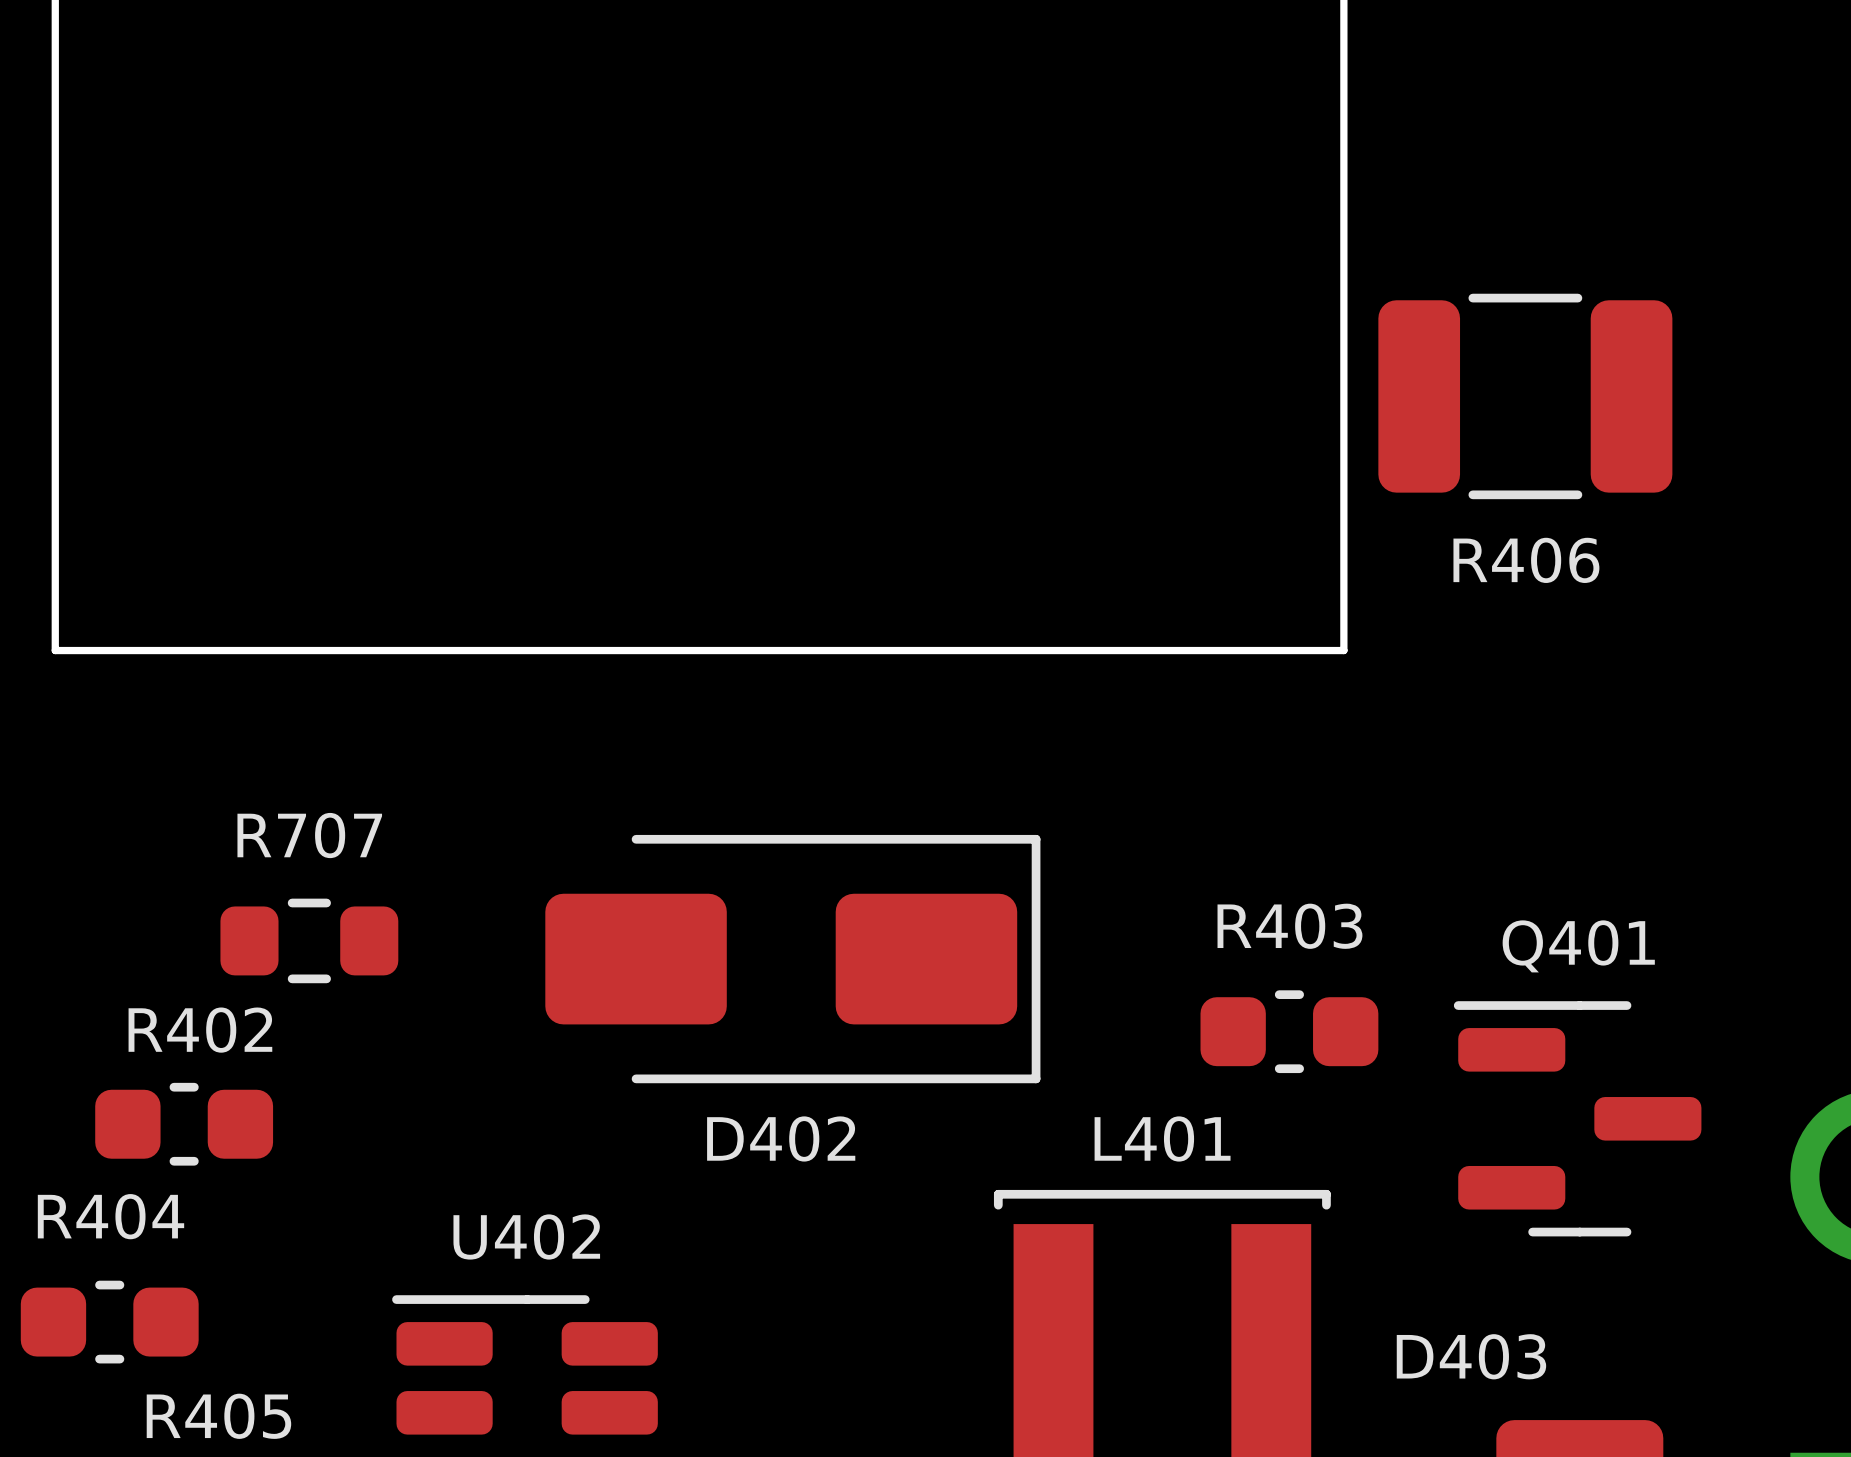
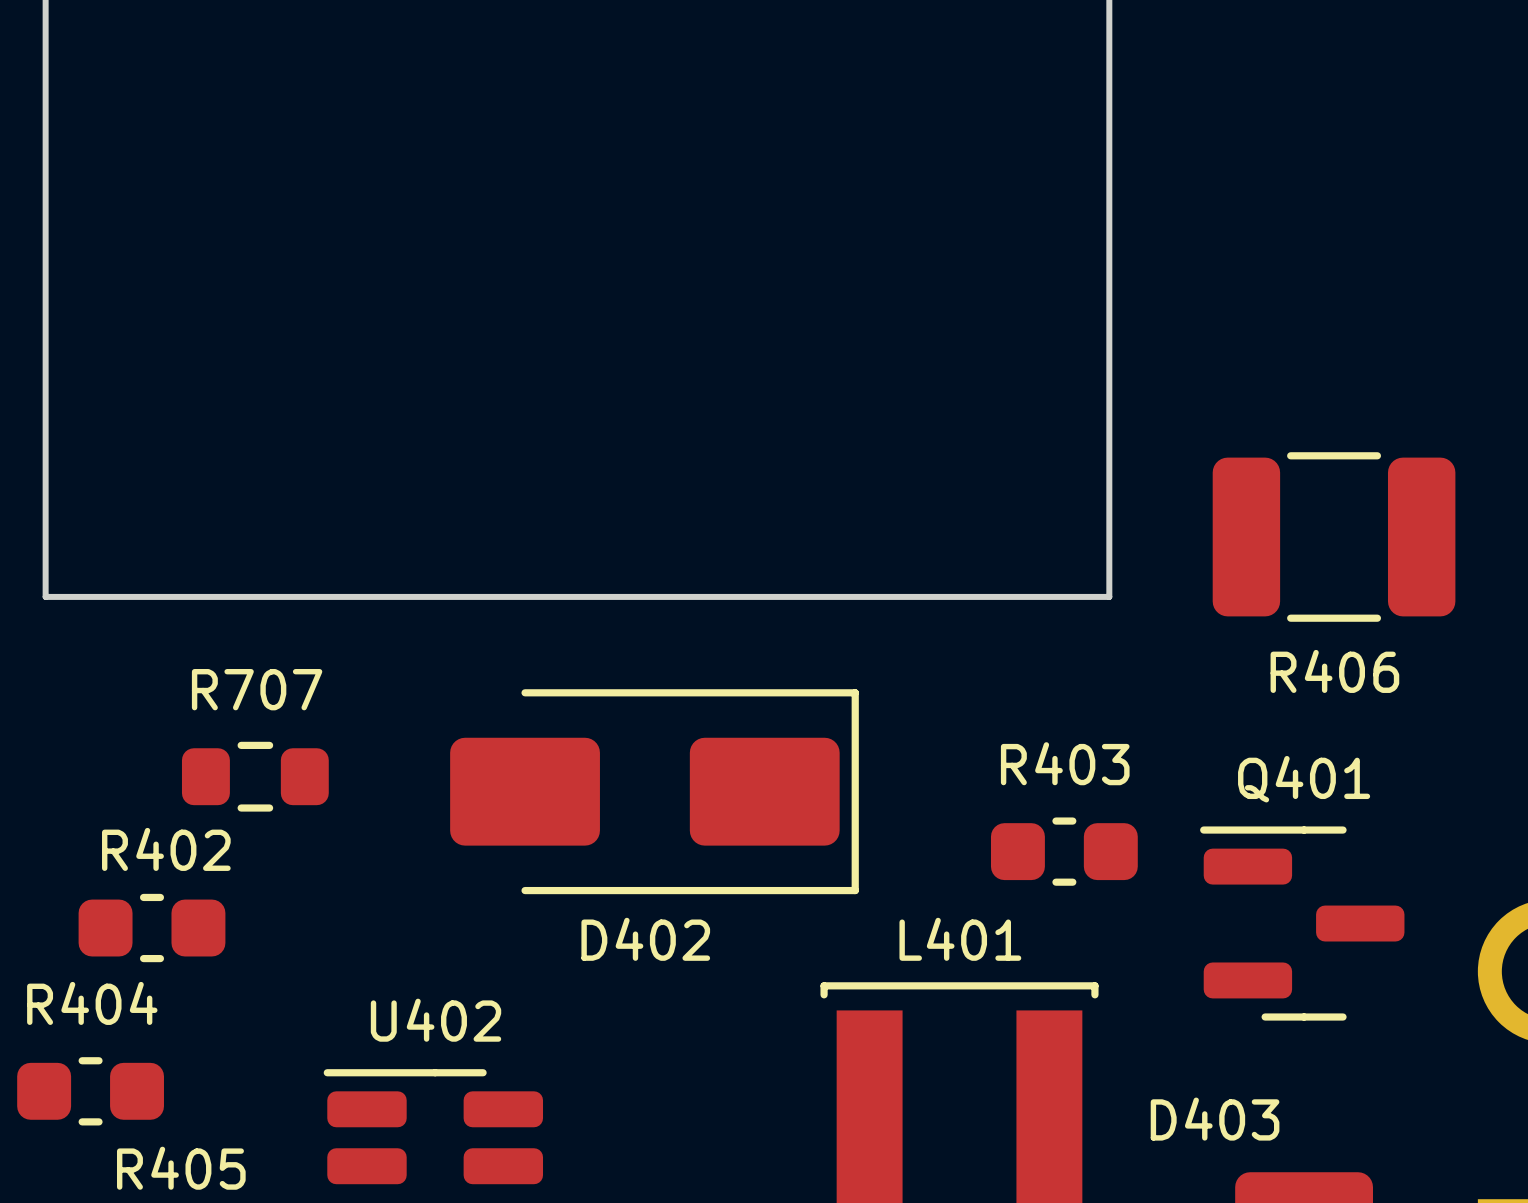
R406 position: (1525, 396) -> (1334, 537)
board edge: (55, 650) (1343, 650) -> (45, 537) (45, 596) (1109, 596) (1109, 537)

